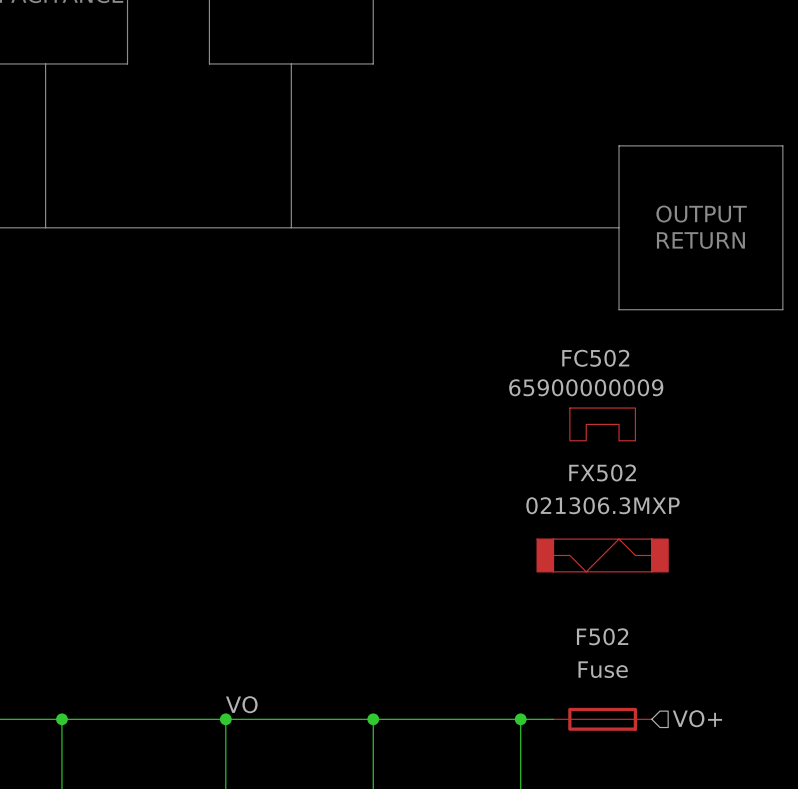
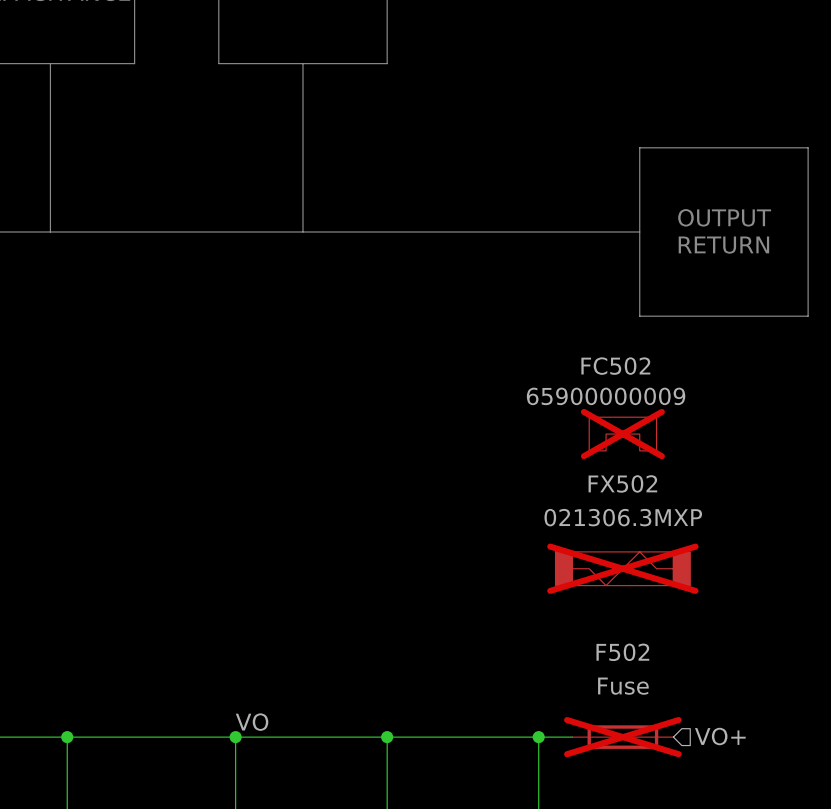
FC502 do-not-place cross: none -> (622, 434)
FX502 do-not-place cross: none -> (622, 568)
F502 do-not-place cross: none -> (622, 737)

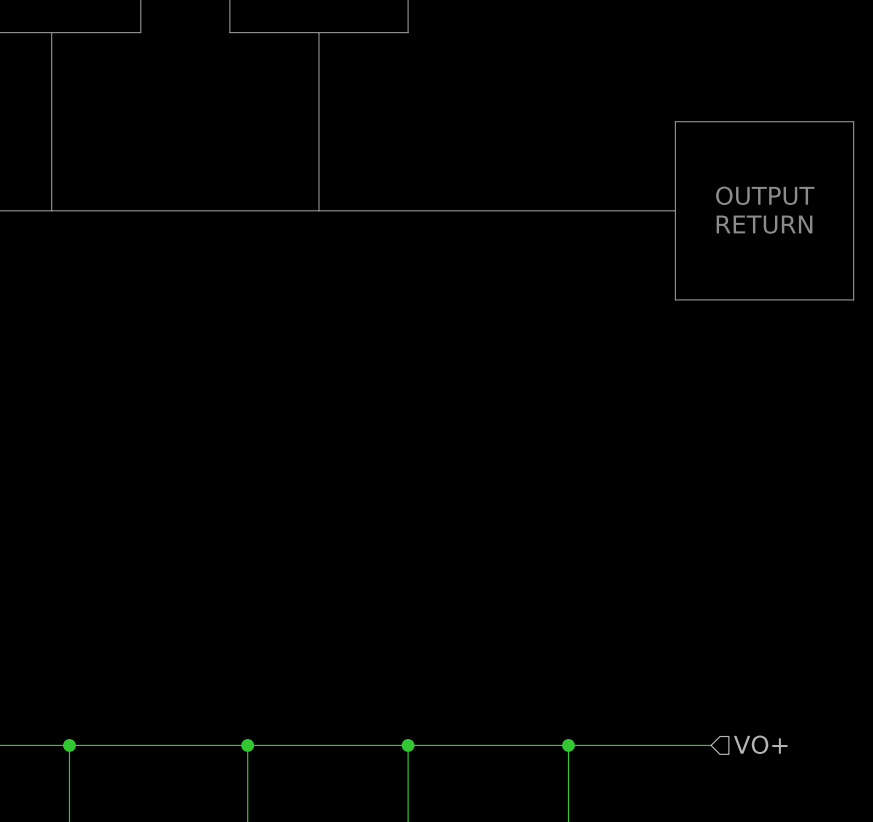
FC502: 65900000009 (622, 434) -> none
FX502: 021306.3MXP (622, 568) -> none
label: VO (252, 722) -> none
F502: Fuse (622, 737) -> none

